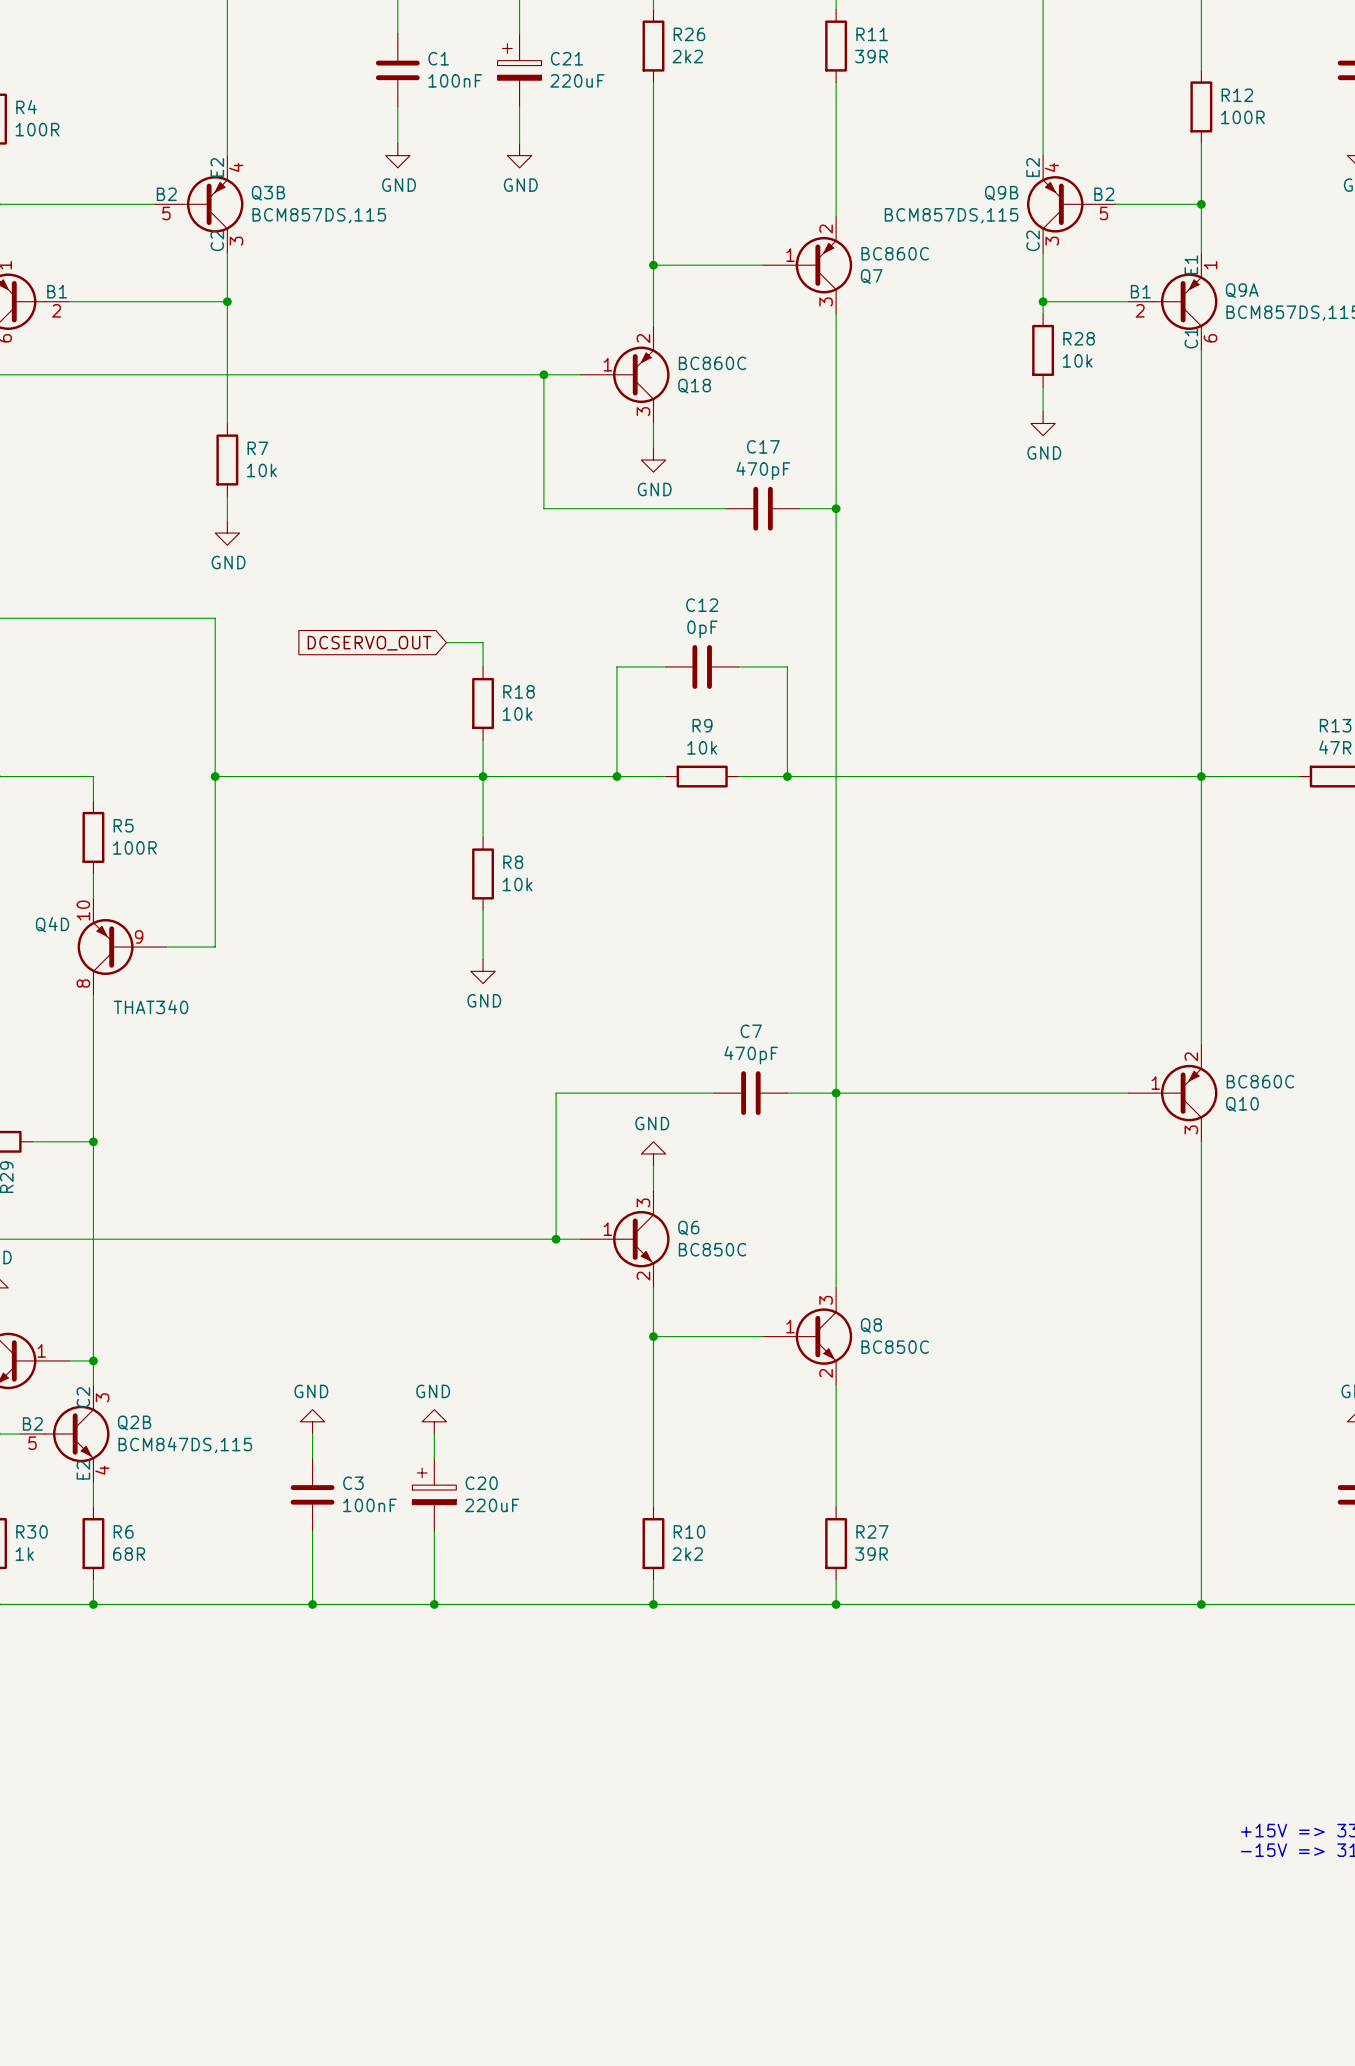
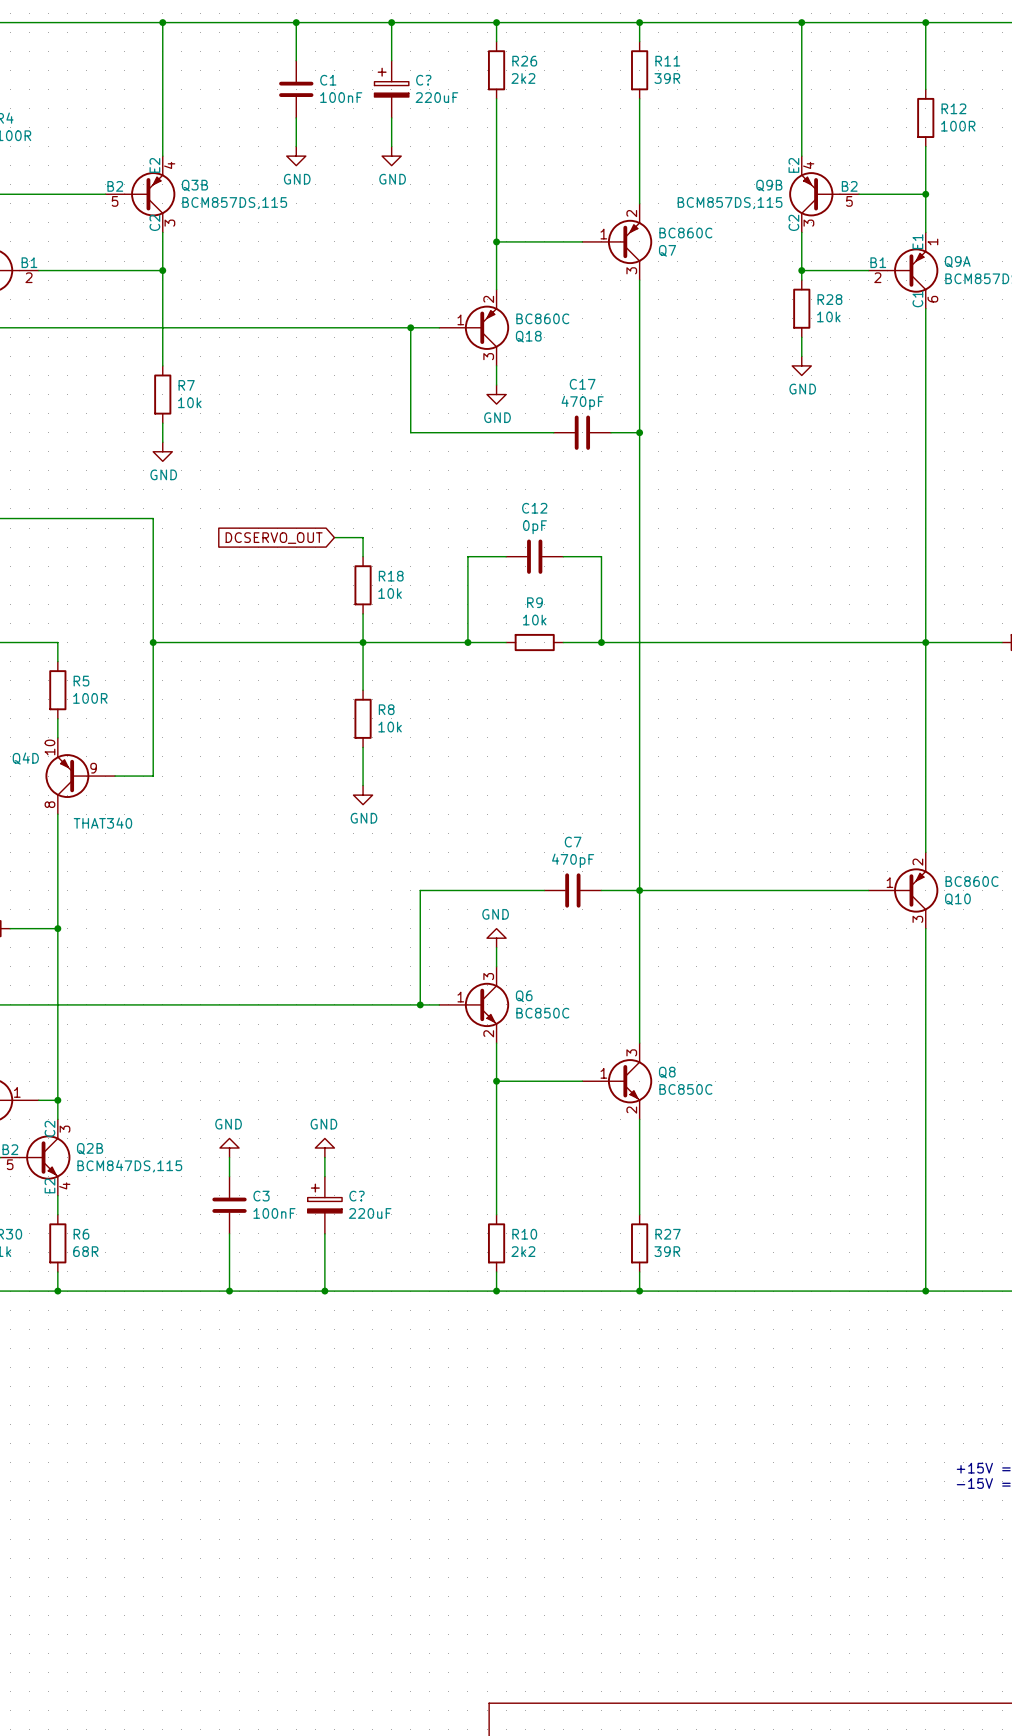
C21 name: C21 (566, 58) -> C? (423, 80)
C20 name: C20 (481, 1483) -> C? (357, 1196)

